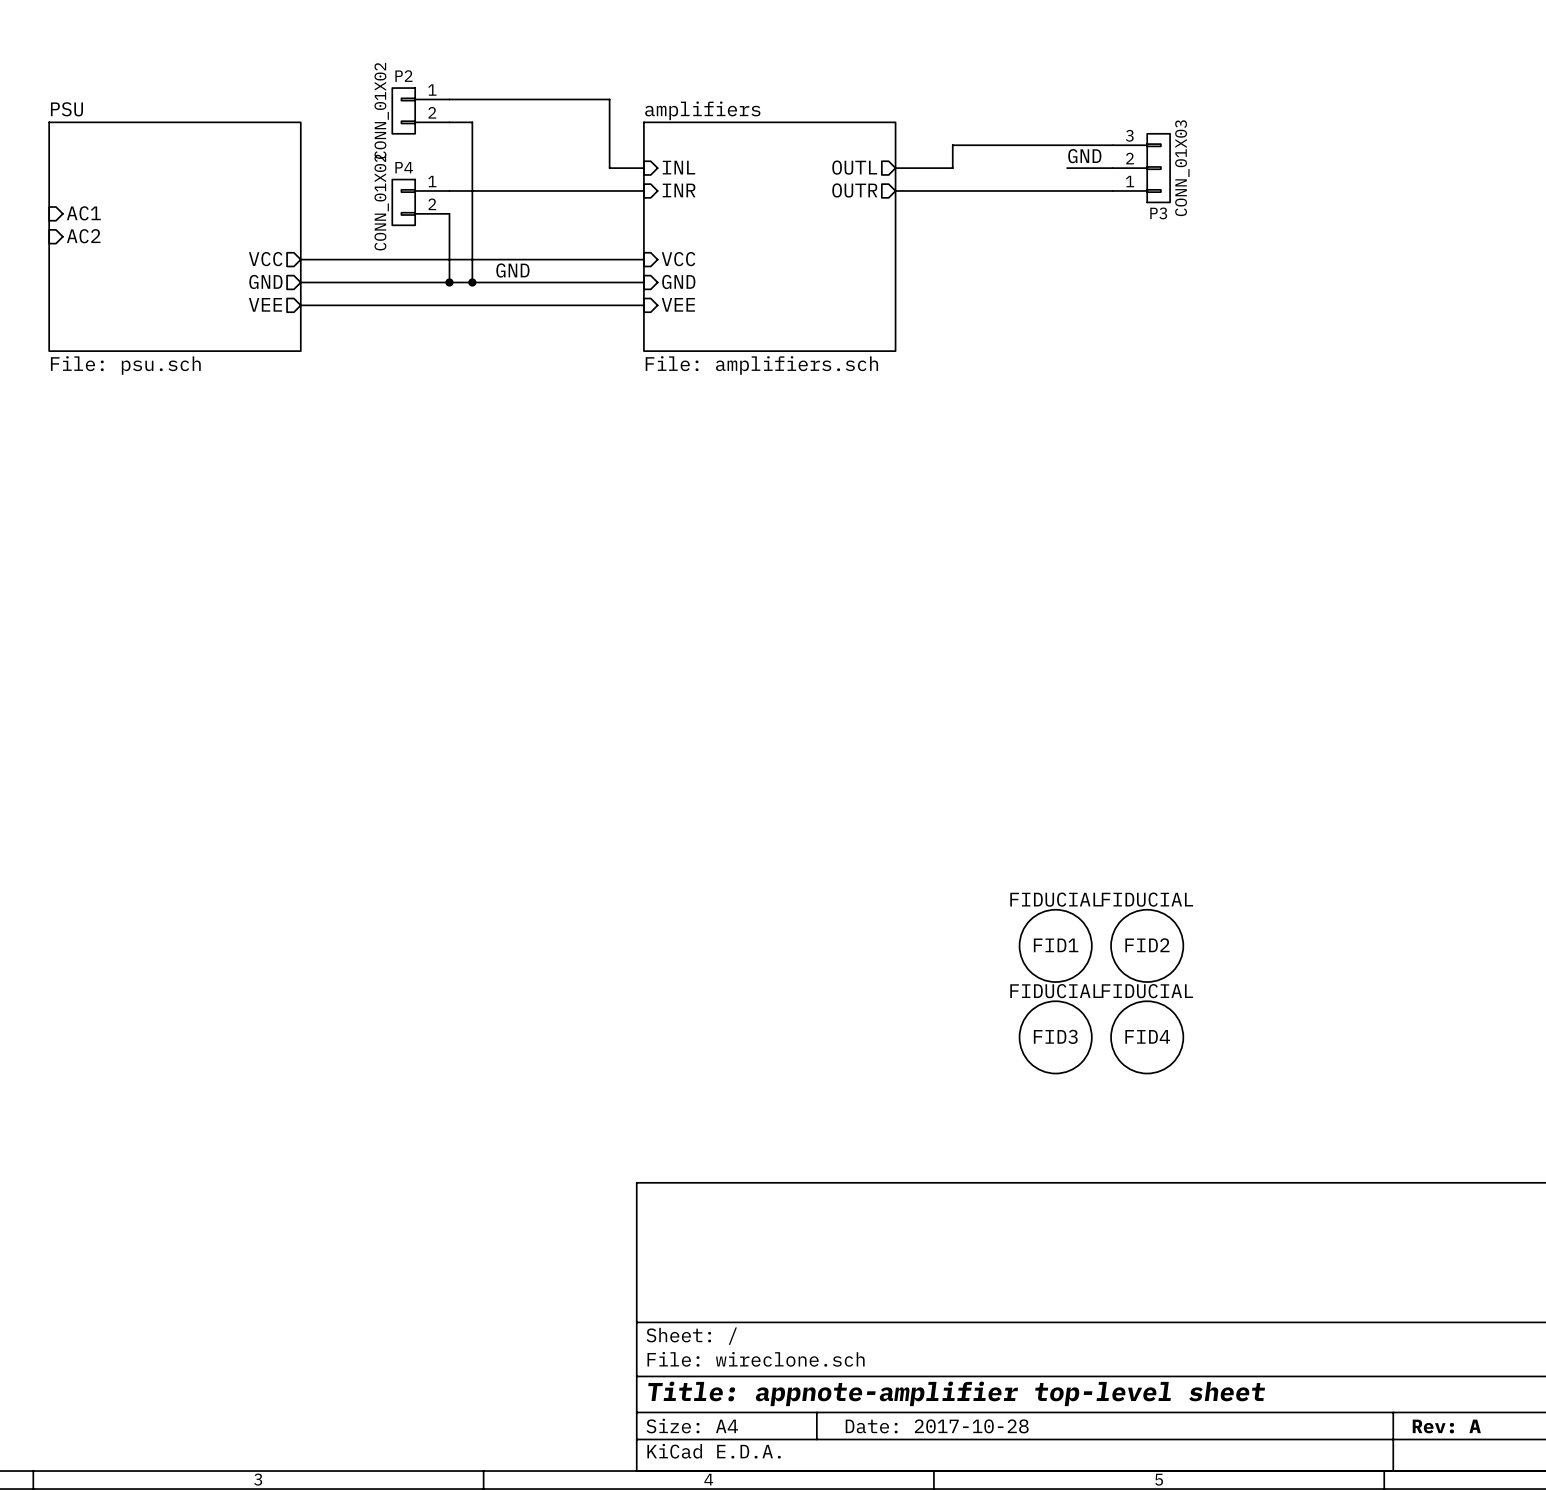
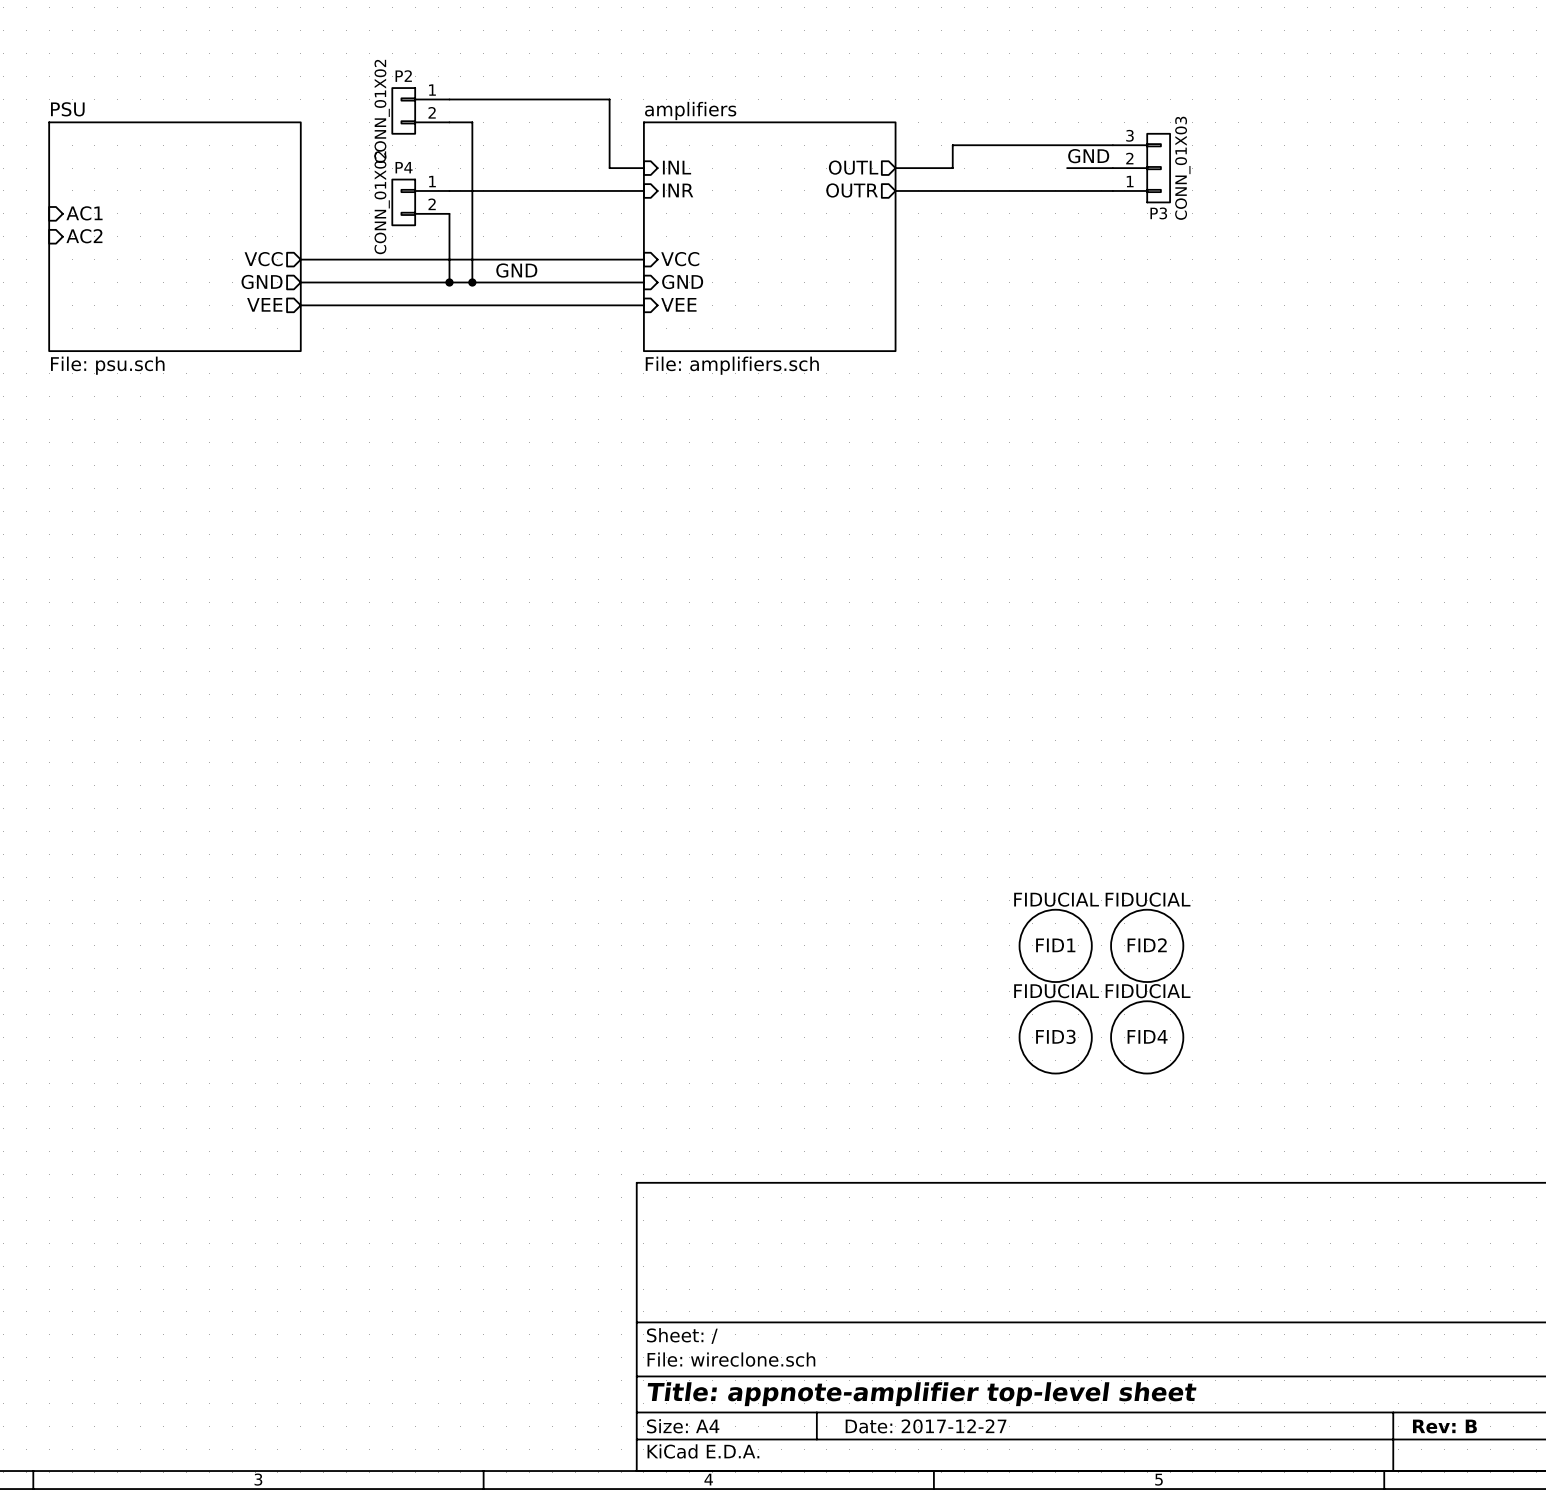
title block: Date: 2017-10-28 (937, 1426) -> Date: 2017-12-27 (926, 1426)
title block: Rev: A (1446, 1426) -> Rev: B (1444, 1426)

